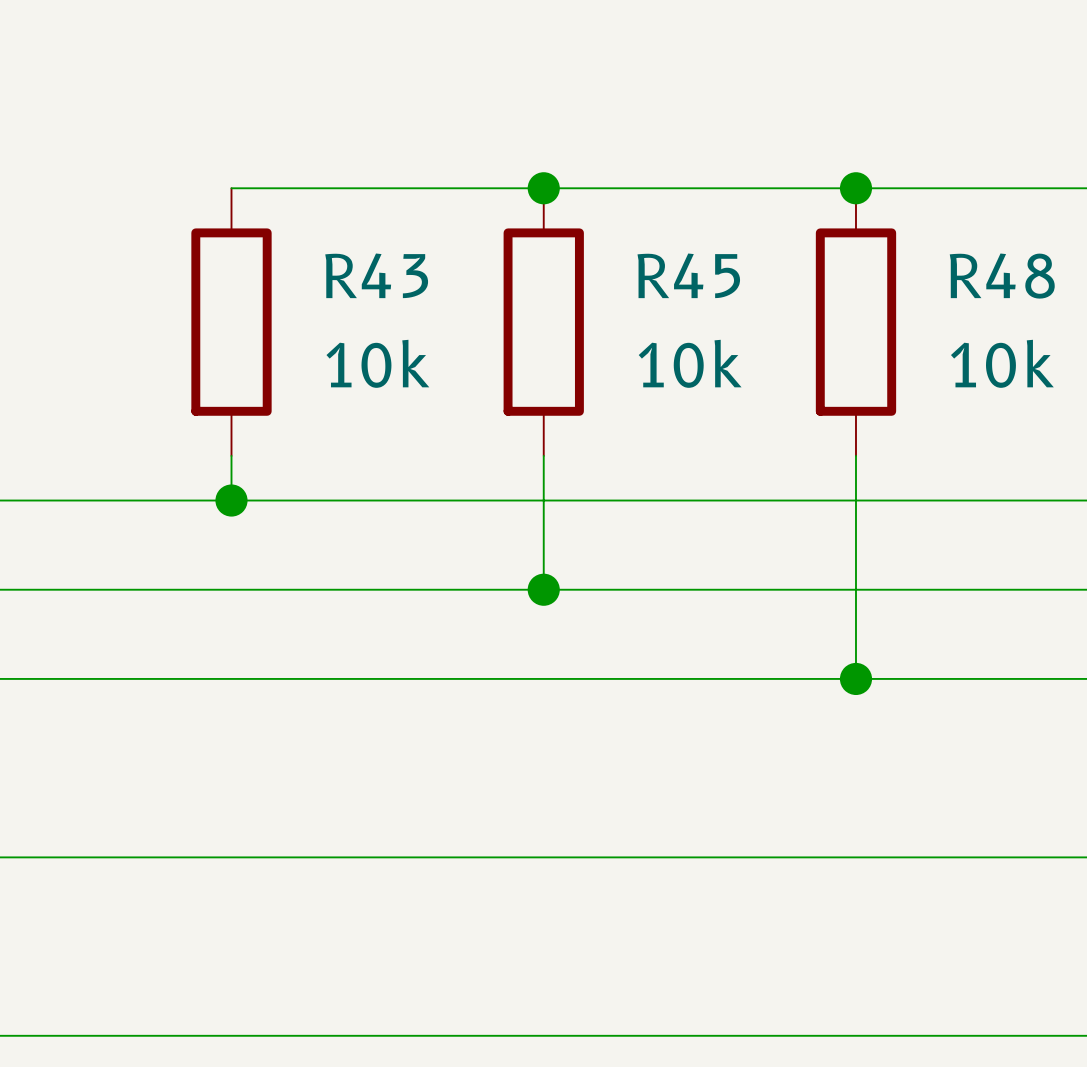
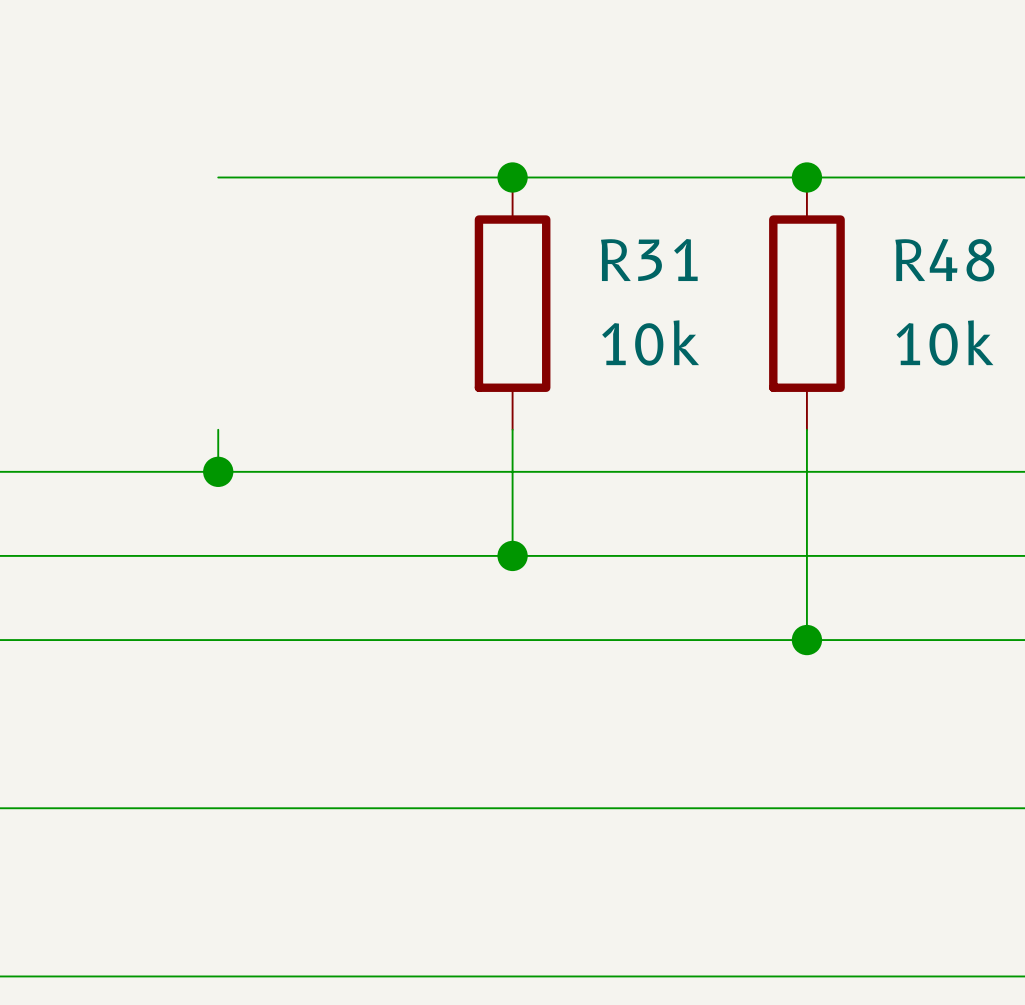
R45 name: R45 (688, 275) -> R31 (649, 260)
R43: 10k (231, 322) -> none

